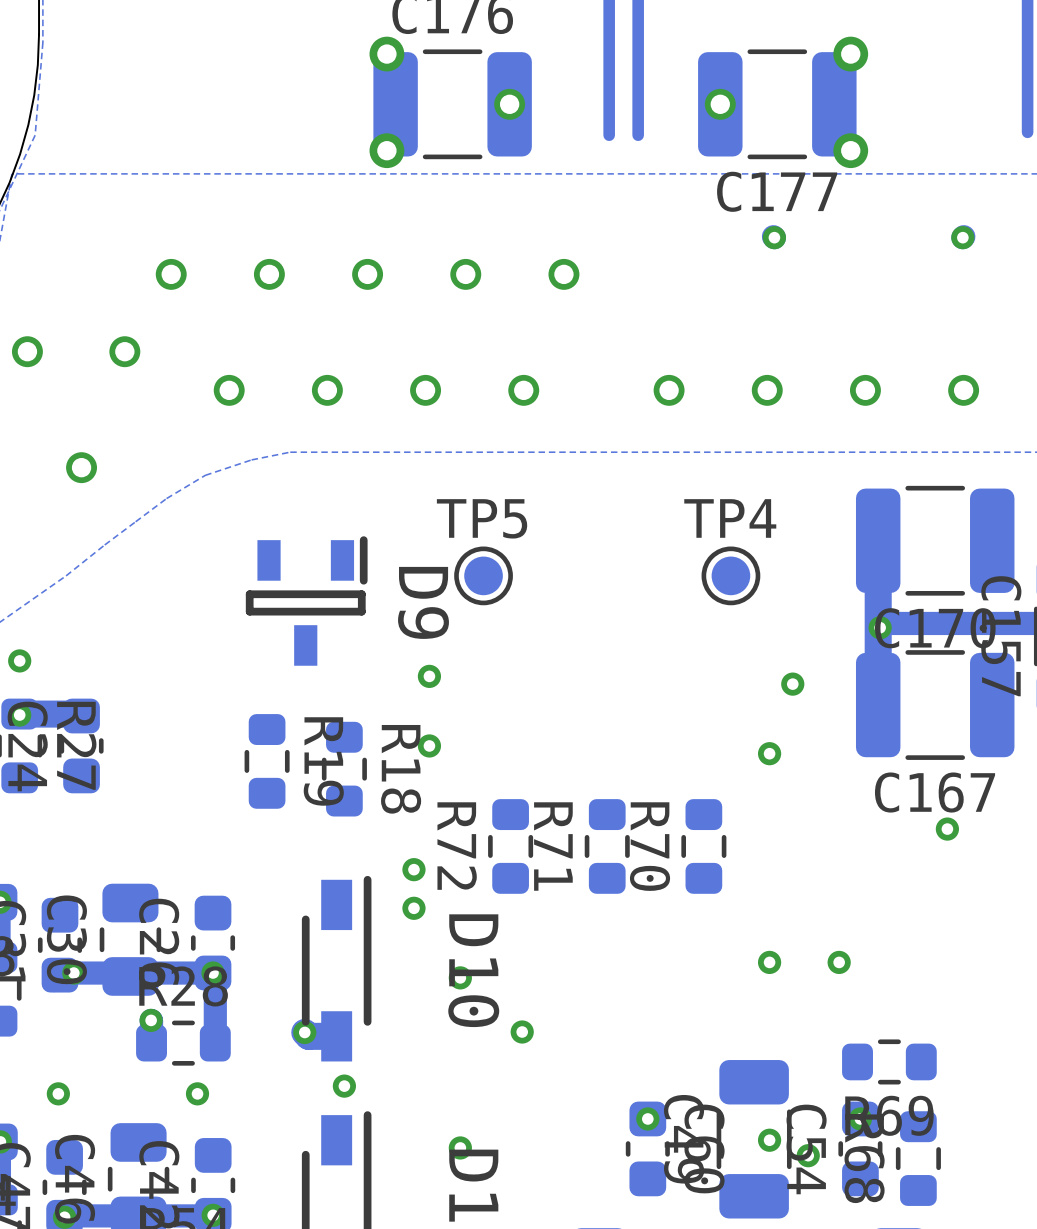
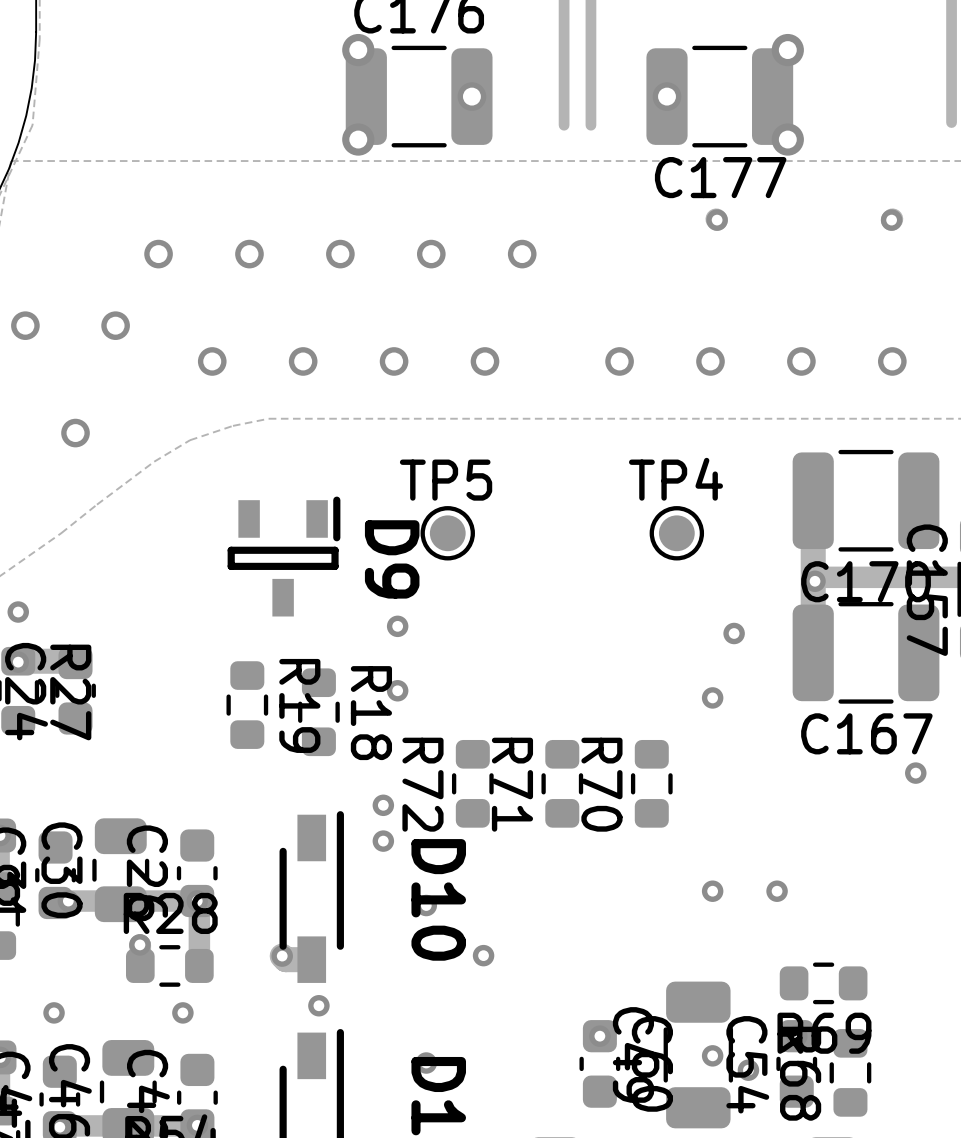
via position: (947, 829) -> (915, 773)

